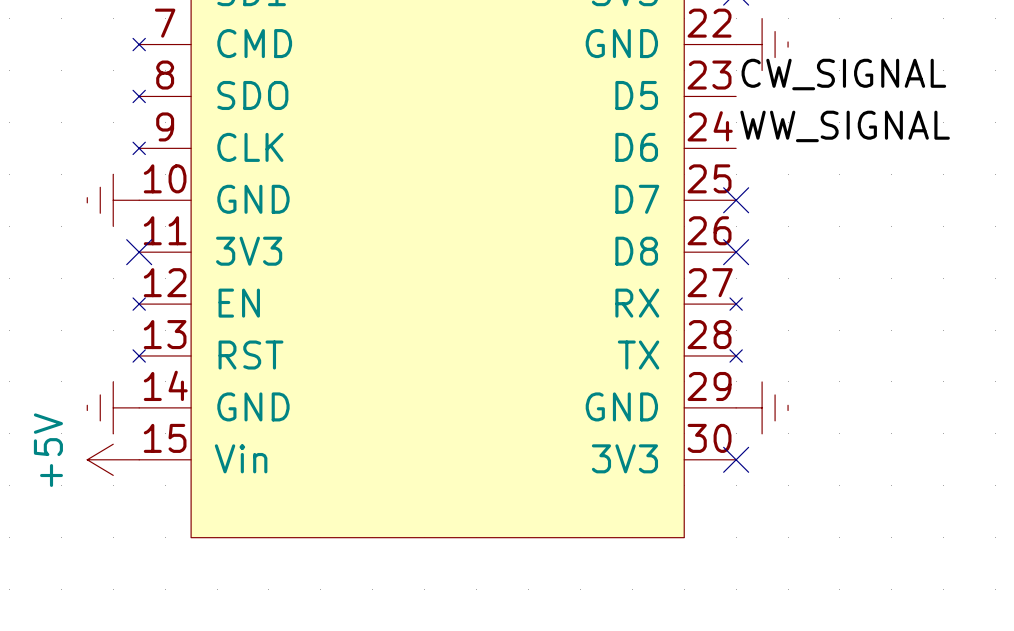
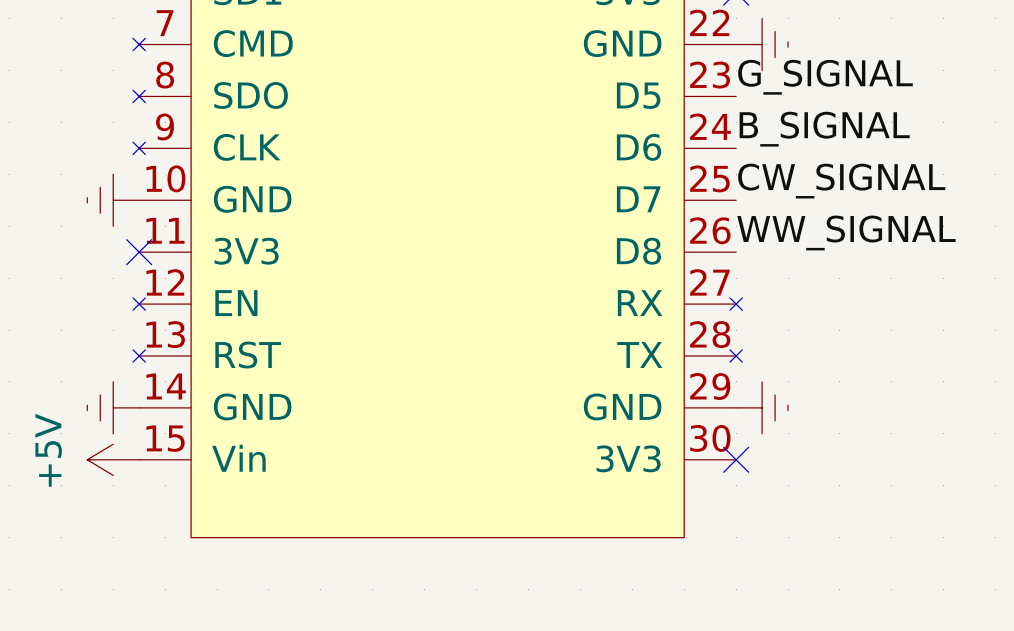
label: CW_SIGNAL (843, 74) -> G_SIGNAL (825, 77)
label: WW_SIGNAL (845, 126) -> B_SIGNAL (824, 129)
label: none -> CW_SIGNAL (841, 181)
no-connect mark: (736, 200) -> none
label: none -> WW_SIGNAL (846, 232)
no-connect mark: (736, 252) -> none

